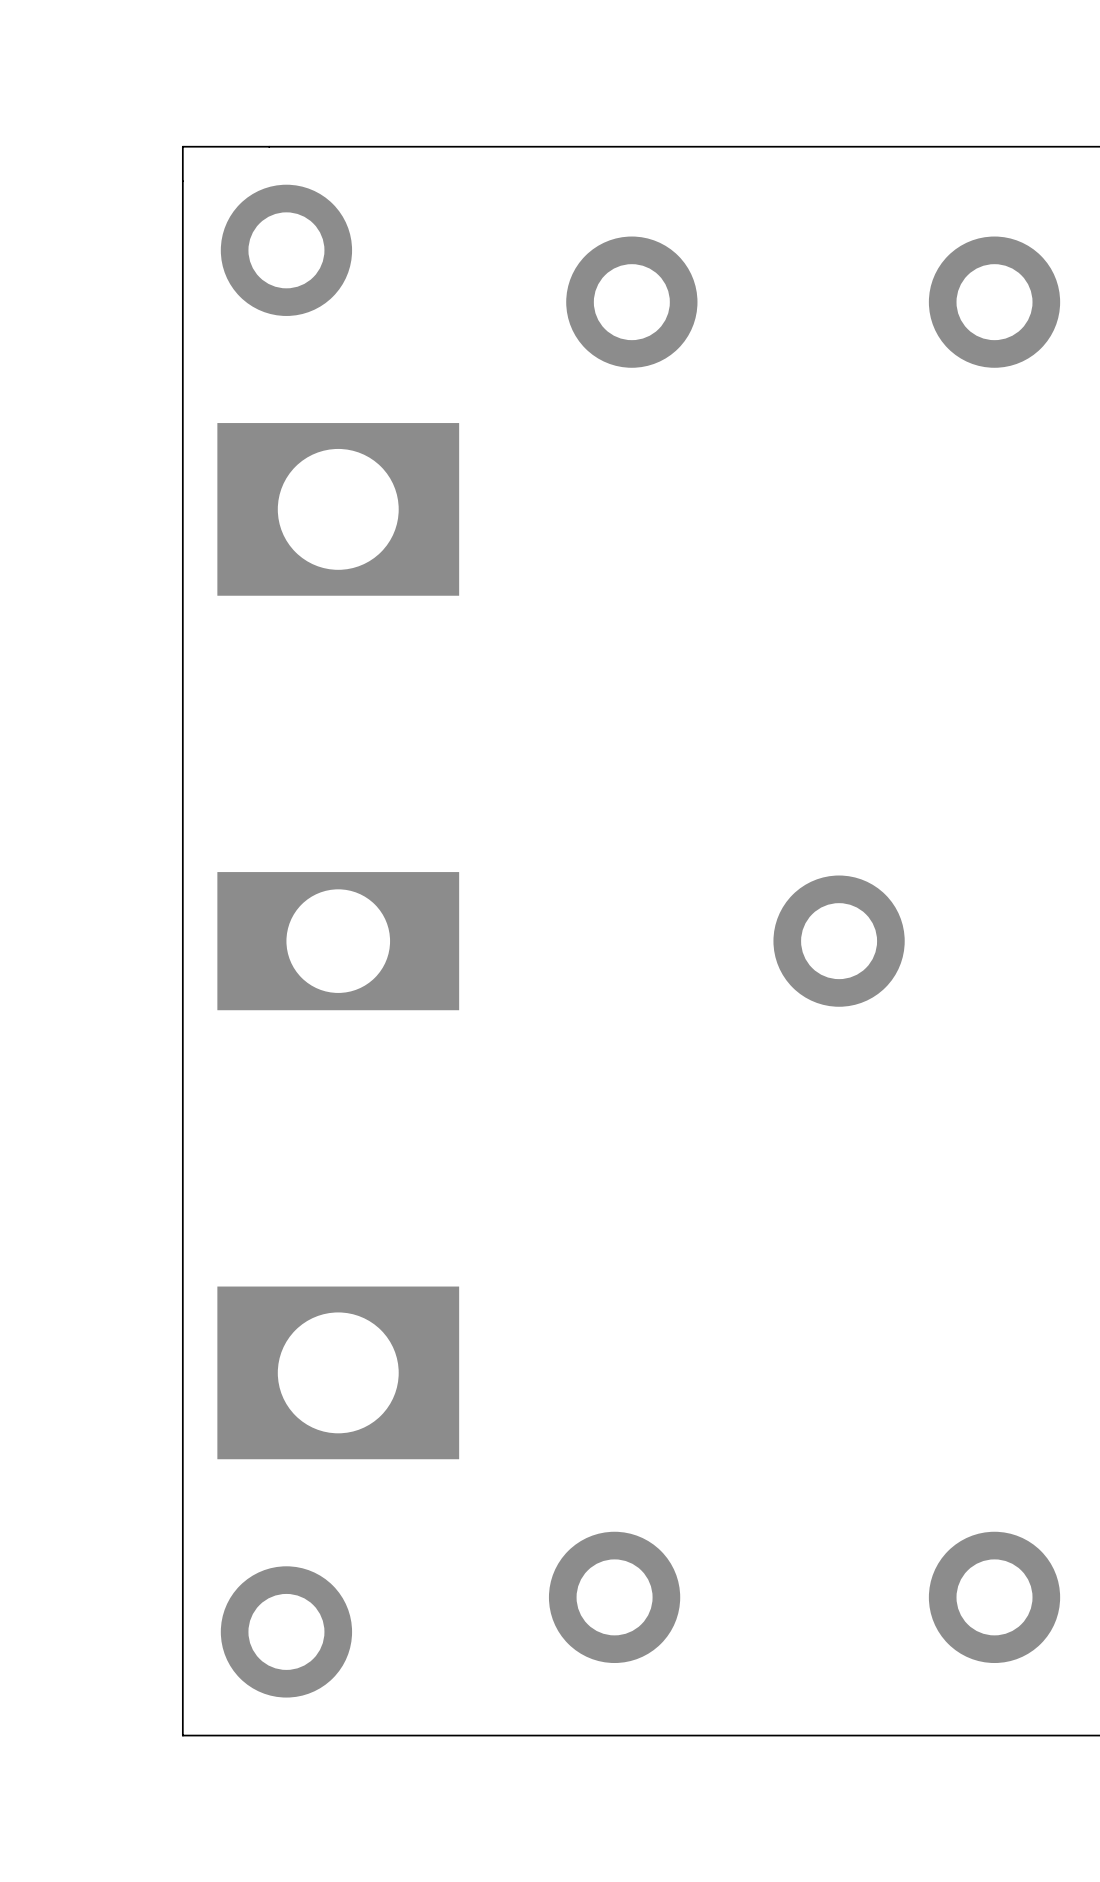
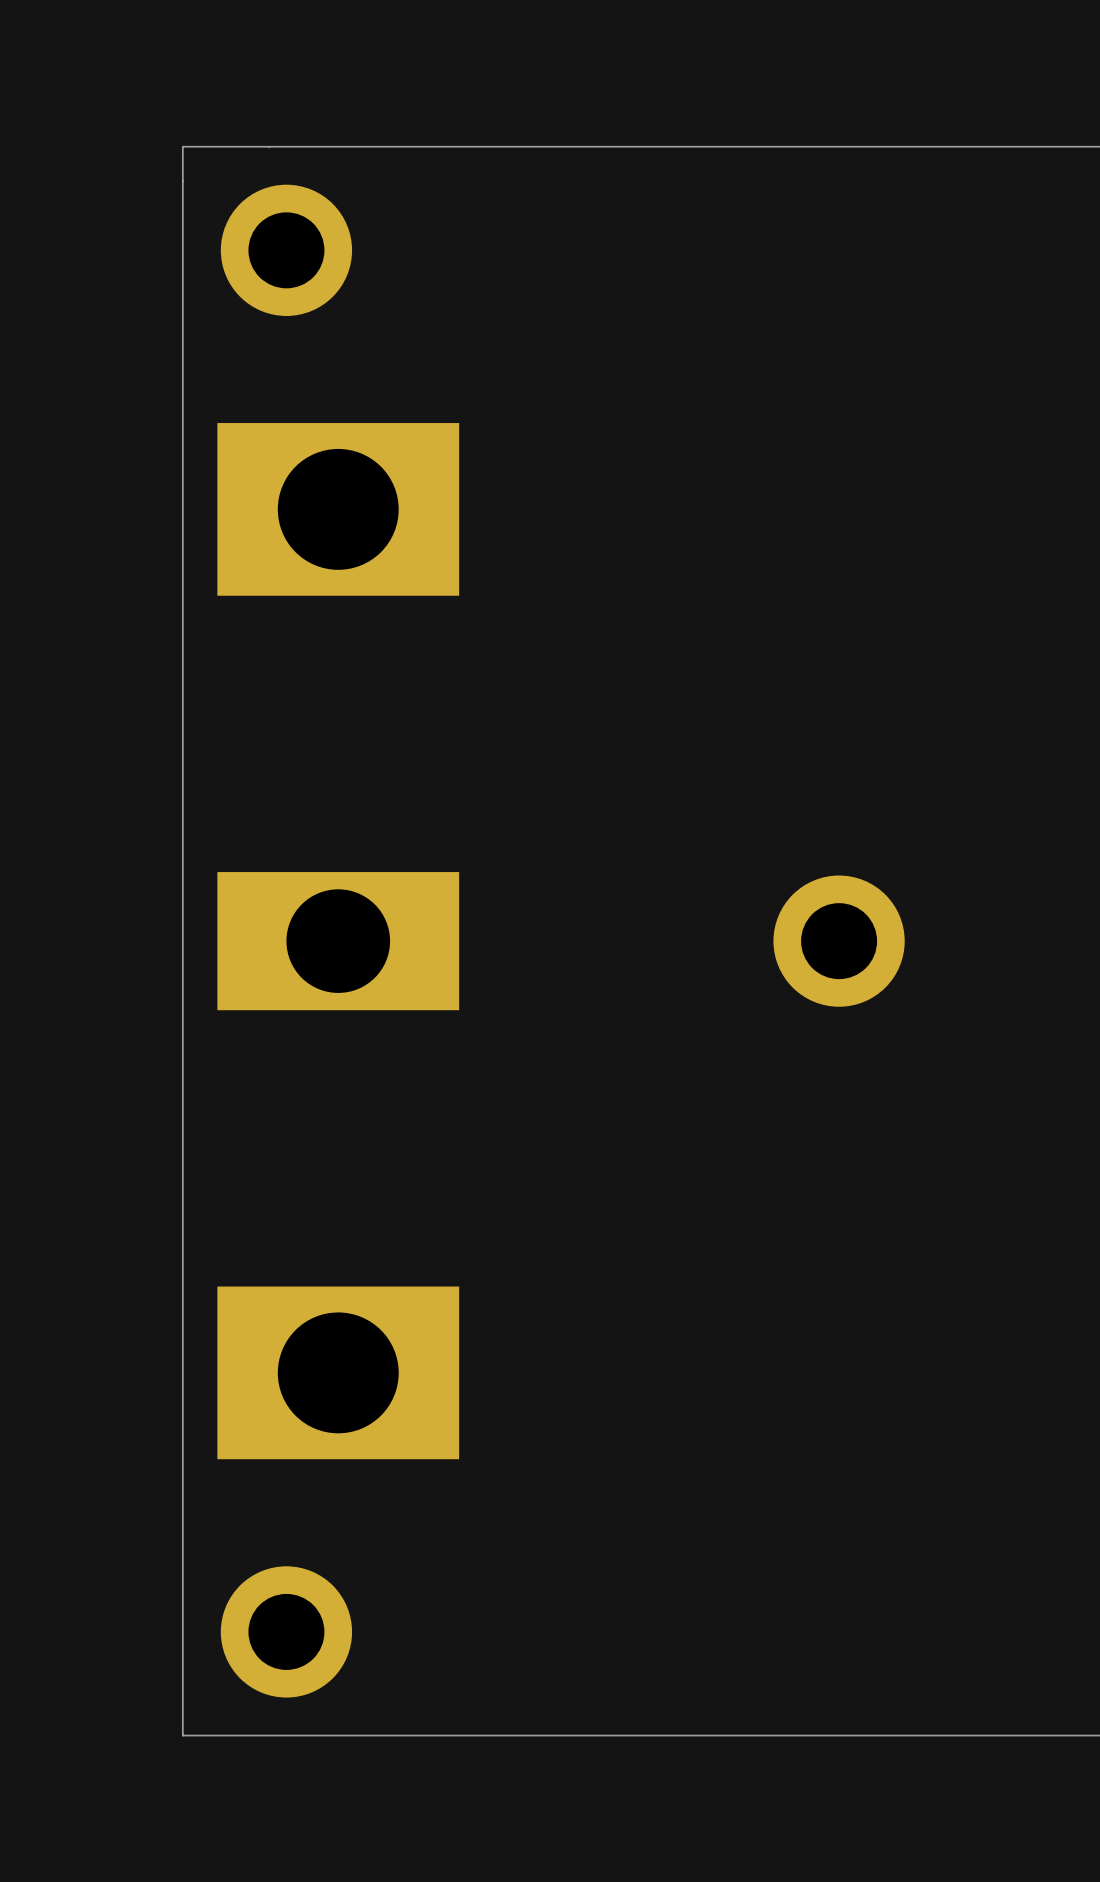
part: (631, 302) -> none
part: (994, 302) -> none
part: (614, 1597) -> none
part: (994, 1597) -> none

